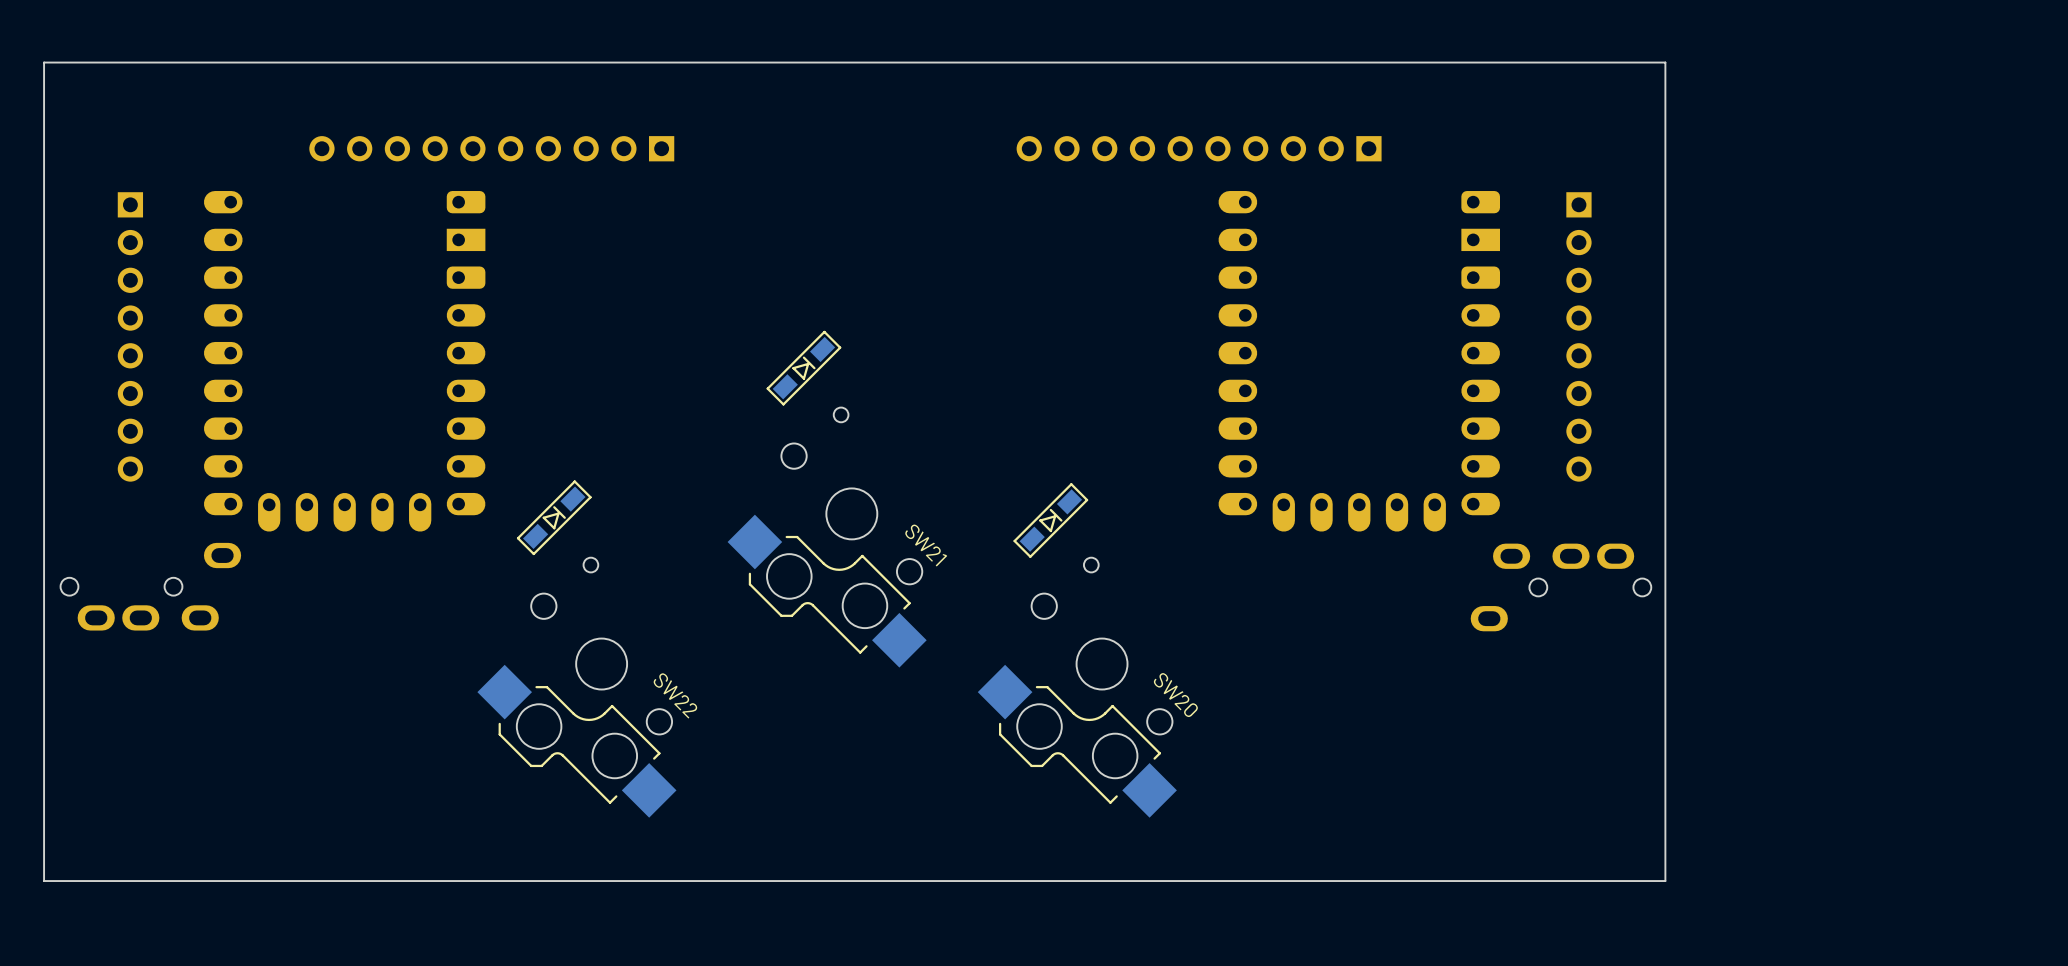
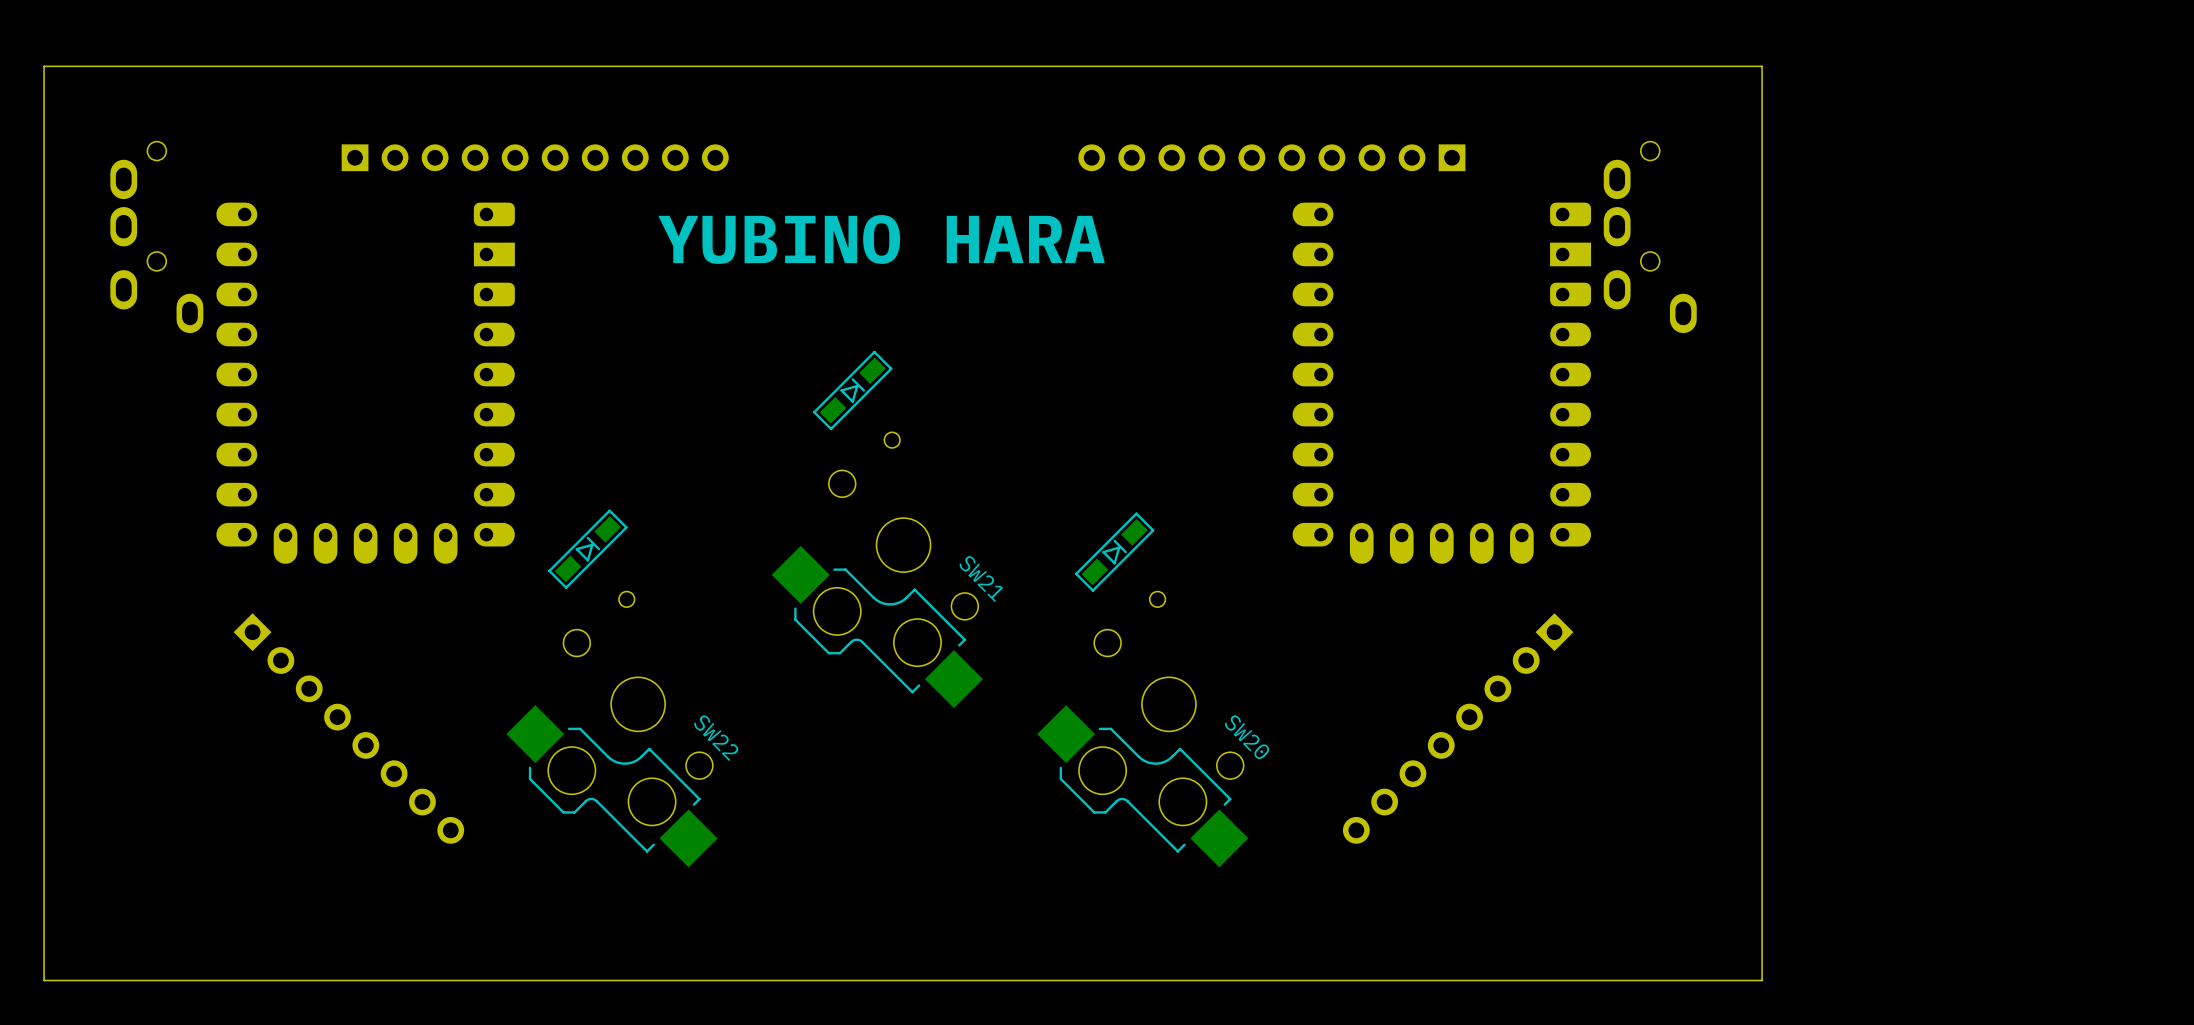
board edge: (1661, 62) (1665, 62) (1665, 881) (44, 881) (44, 62) -> (1762, 66) (1762, 980) (44, 980) (44, 66) (46, 66)
part rotation: 0° (491, 148) -> 180° (535, 157)
text: none -> YUBINO HARA (881, 239)
part: (130, 336) -> none
part: (1578, 336) -> none
part rotation: 0° (150, 586) -> 90° clockwise (156, 237)
part position: (150, 586) -> (156, 237)
part rotation: 0° (1560, 587) -> 90° counterclockwise (1650, 237)
part position: (1560, 587) -> (1650, 237)
part: none -> (348, 728)
part: none -> (1458, 728)

